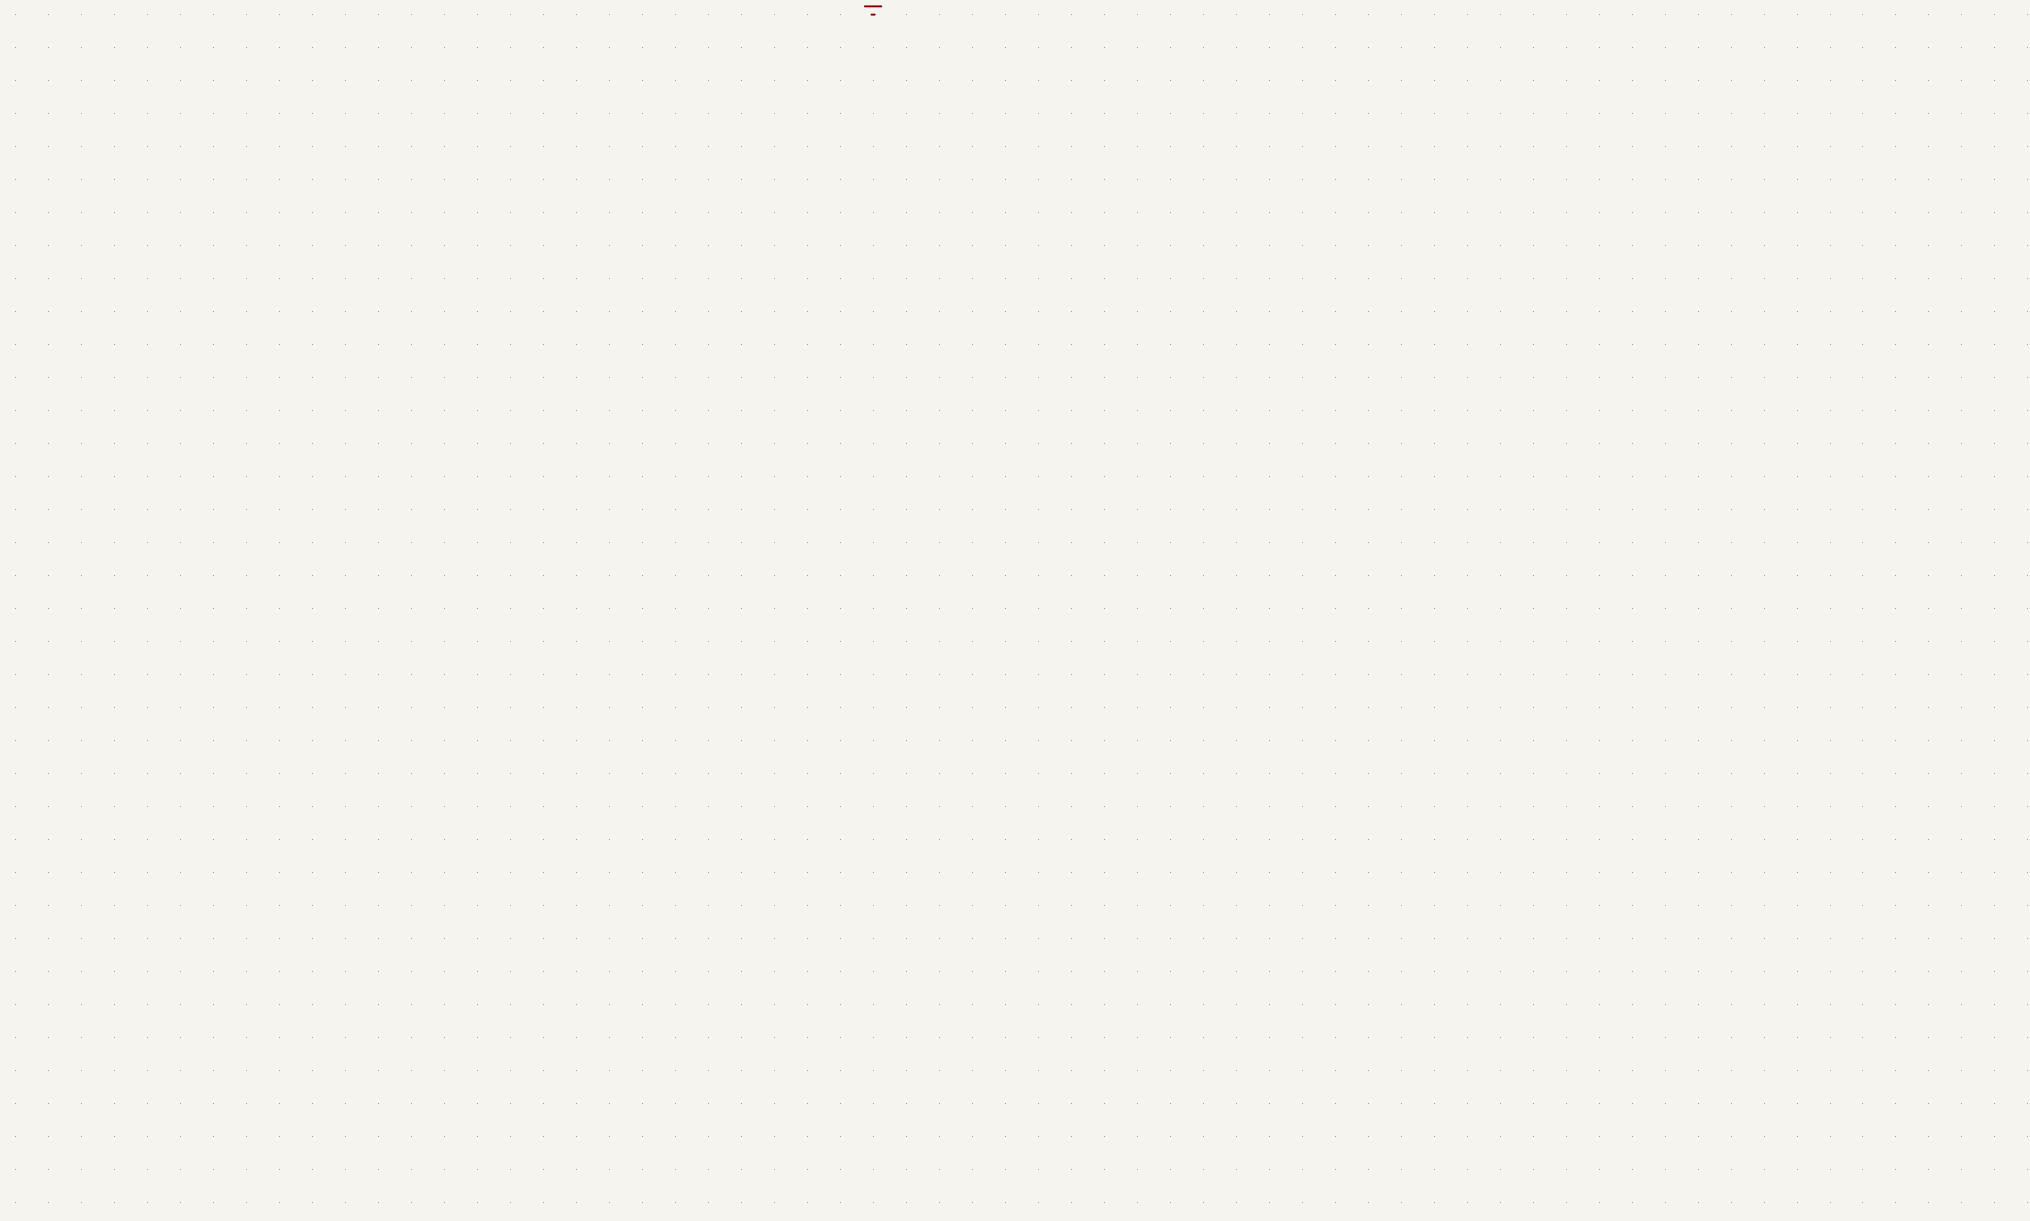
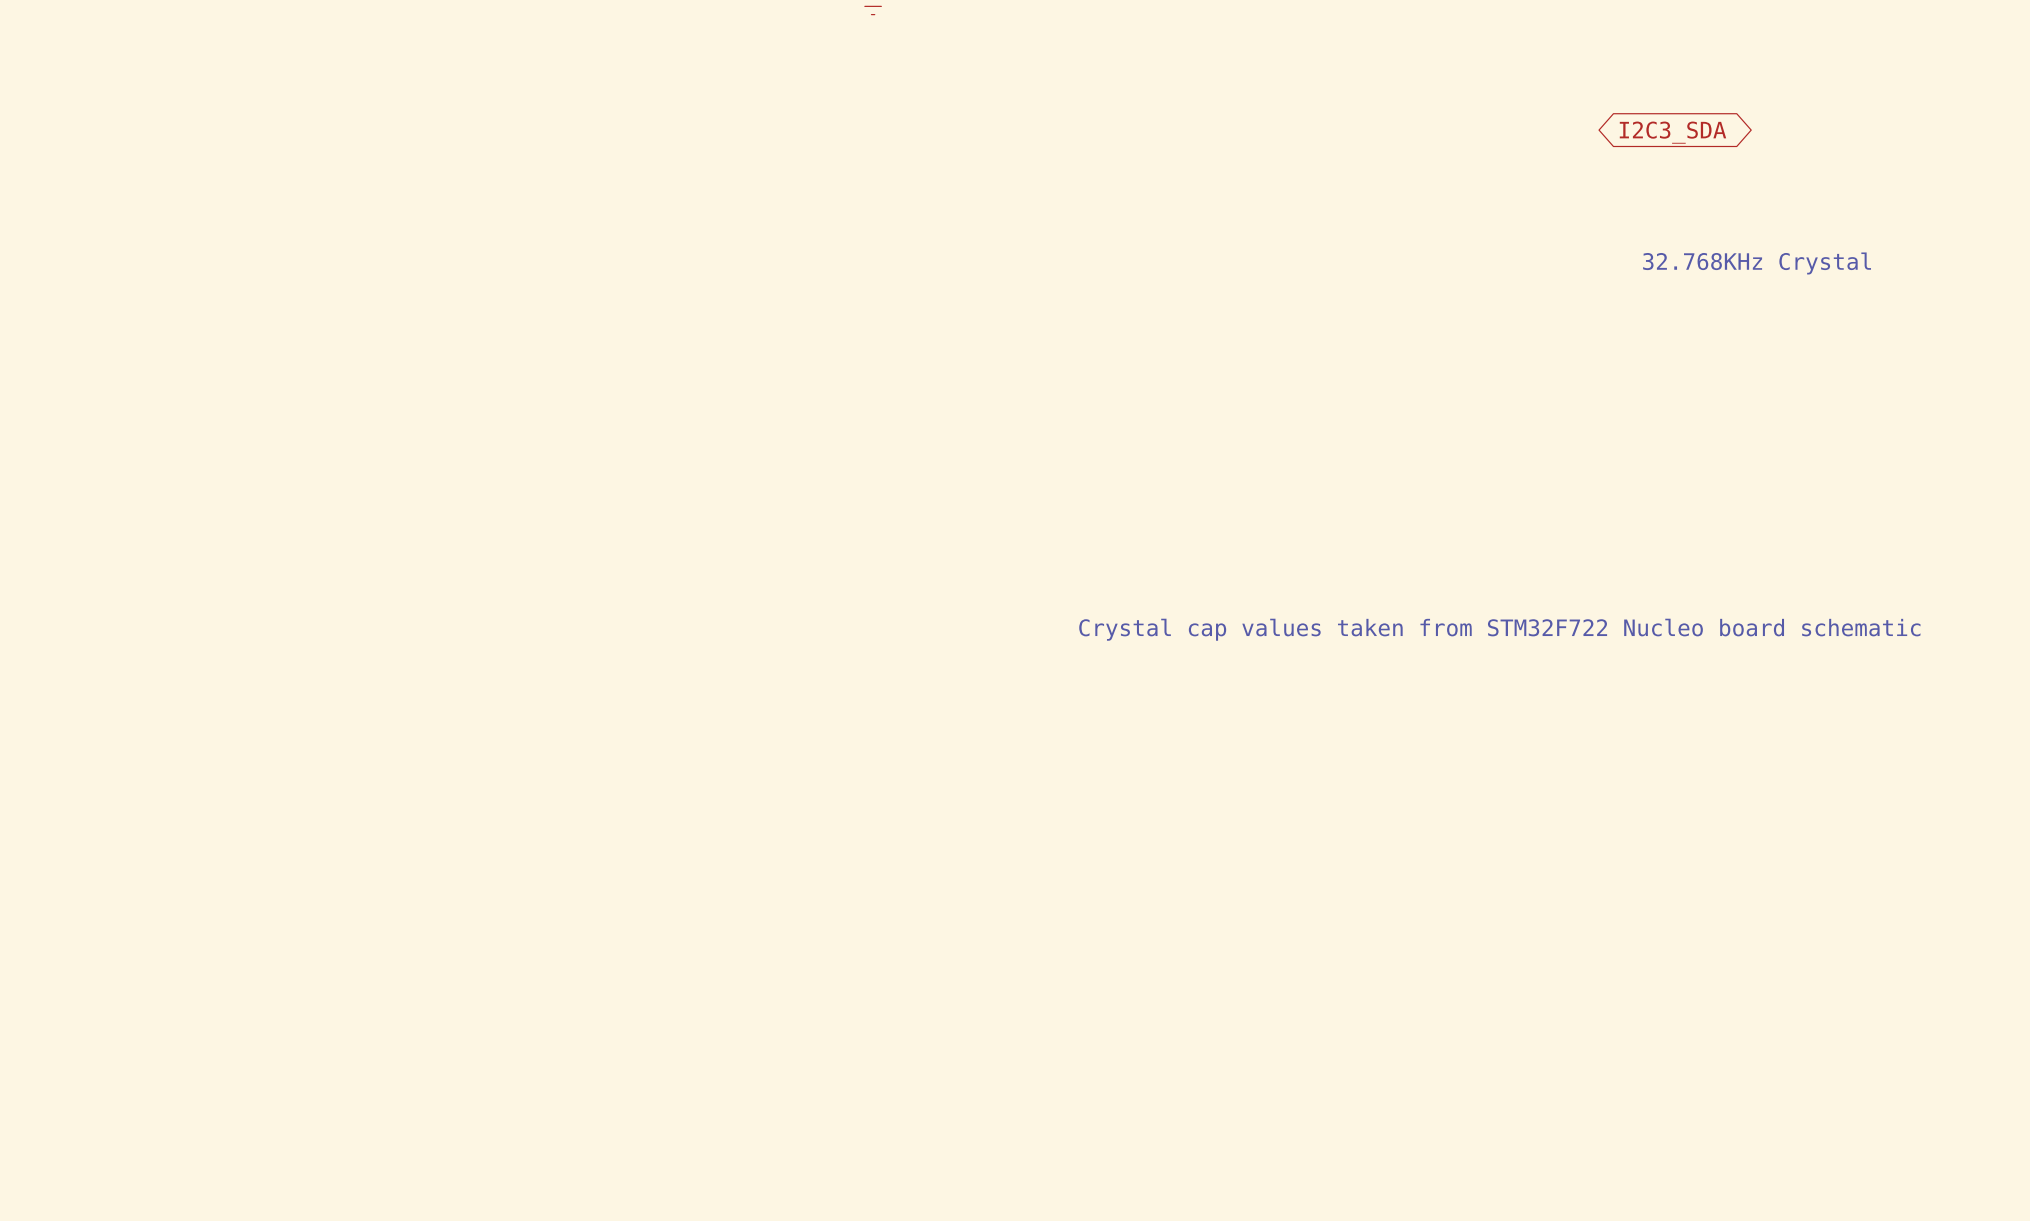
global label: none -> I2C3_SDA (1672, 132)
text: none -> 32.768KHz Crystal (1757, 263)
text: none -> Crystal cap values taken from STM32F722 Nucleo board schematic (1499, 629)

